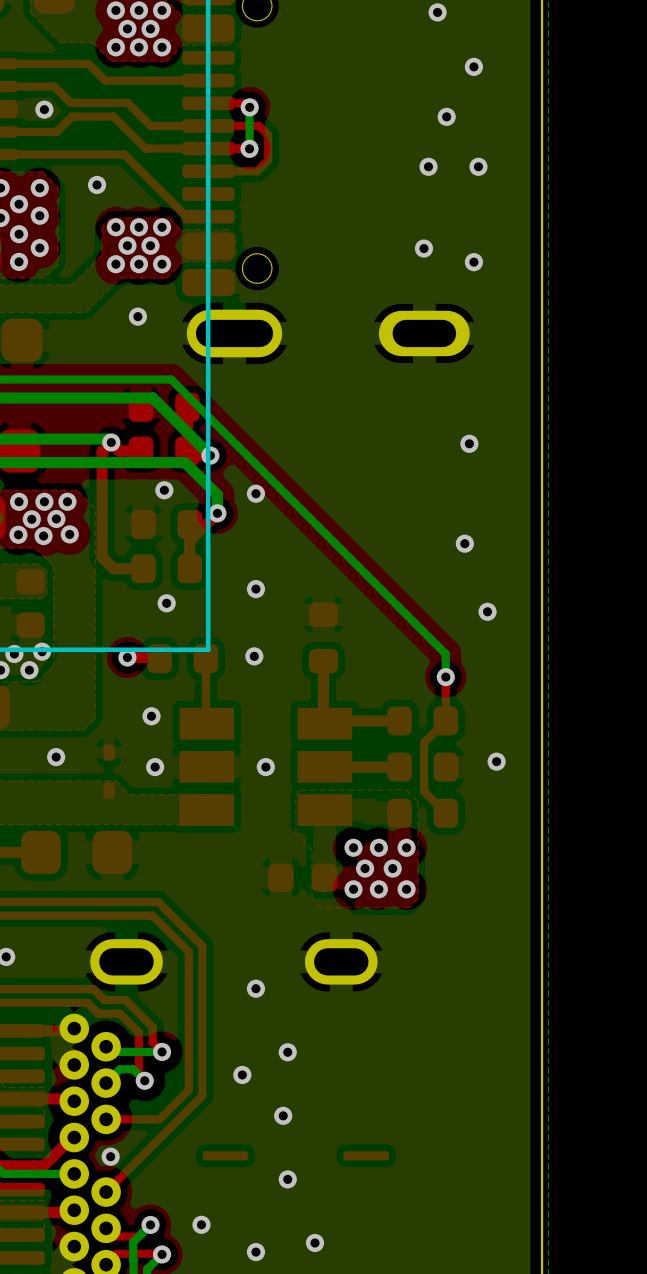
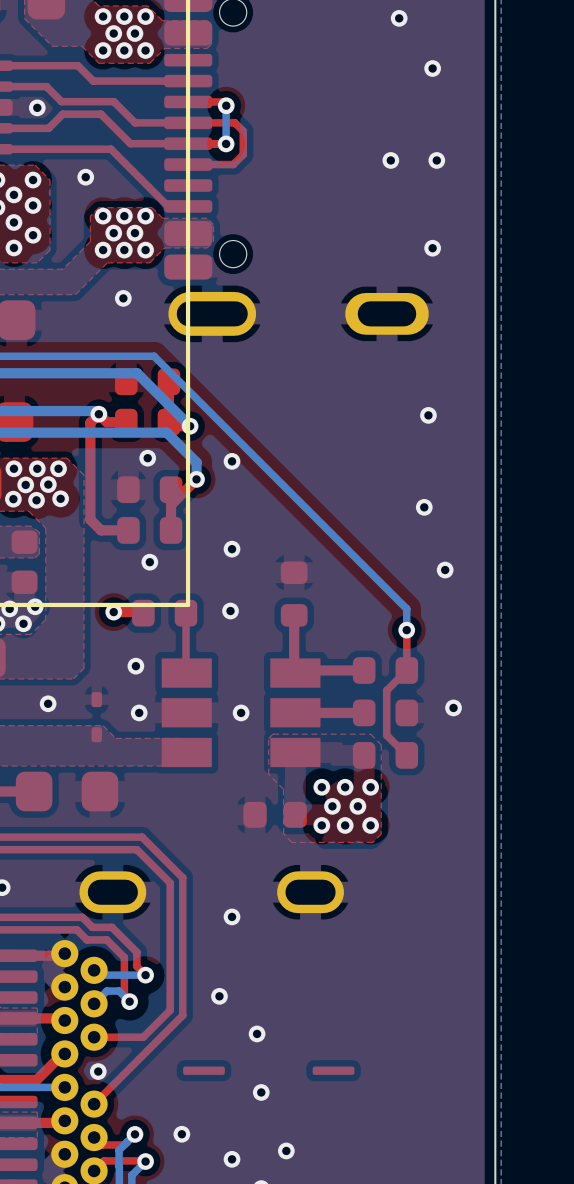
via: (446, 116) -> none
via: (423, 248) -> none
via: (287, 1052) -> none

